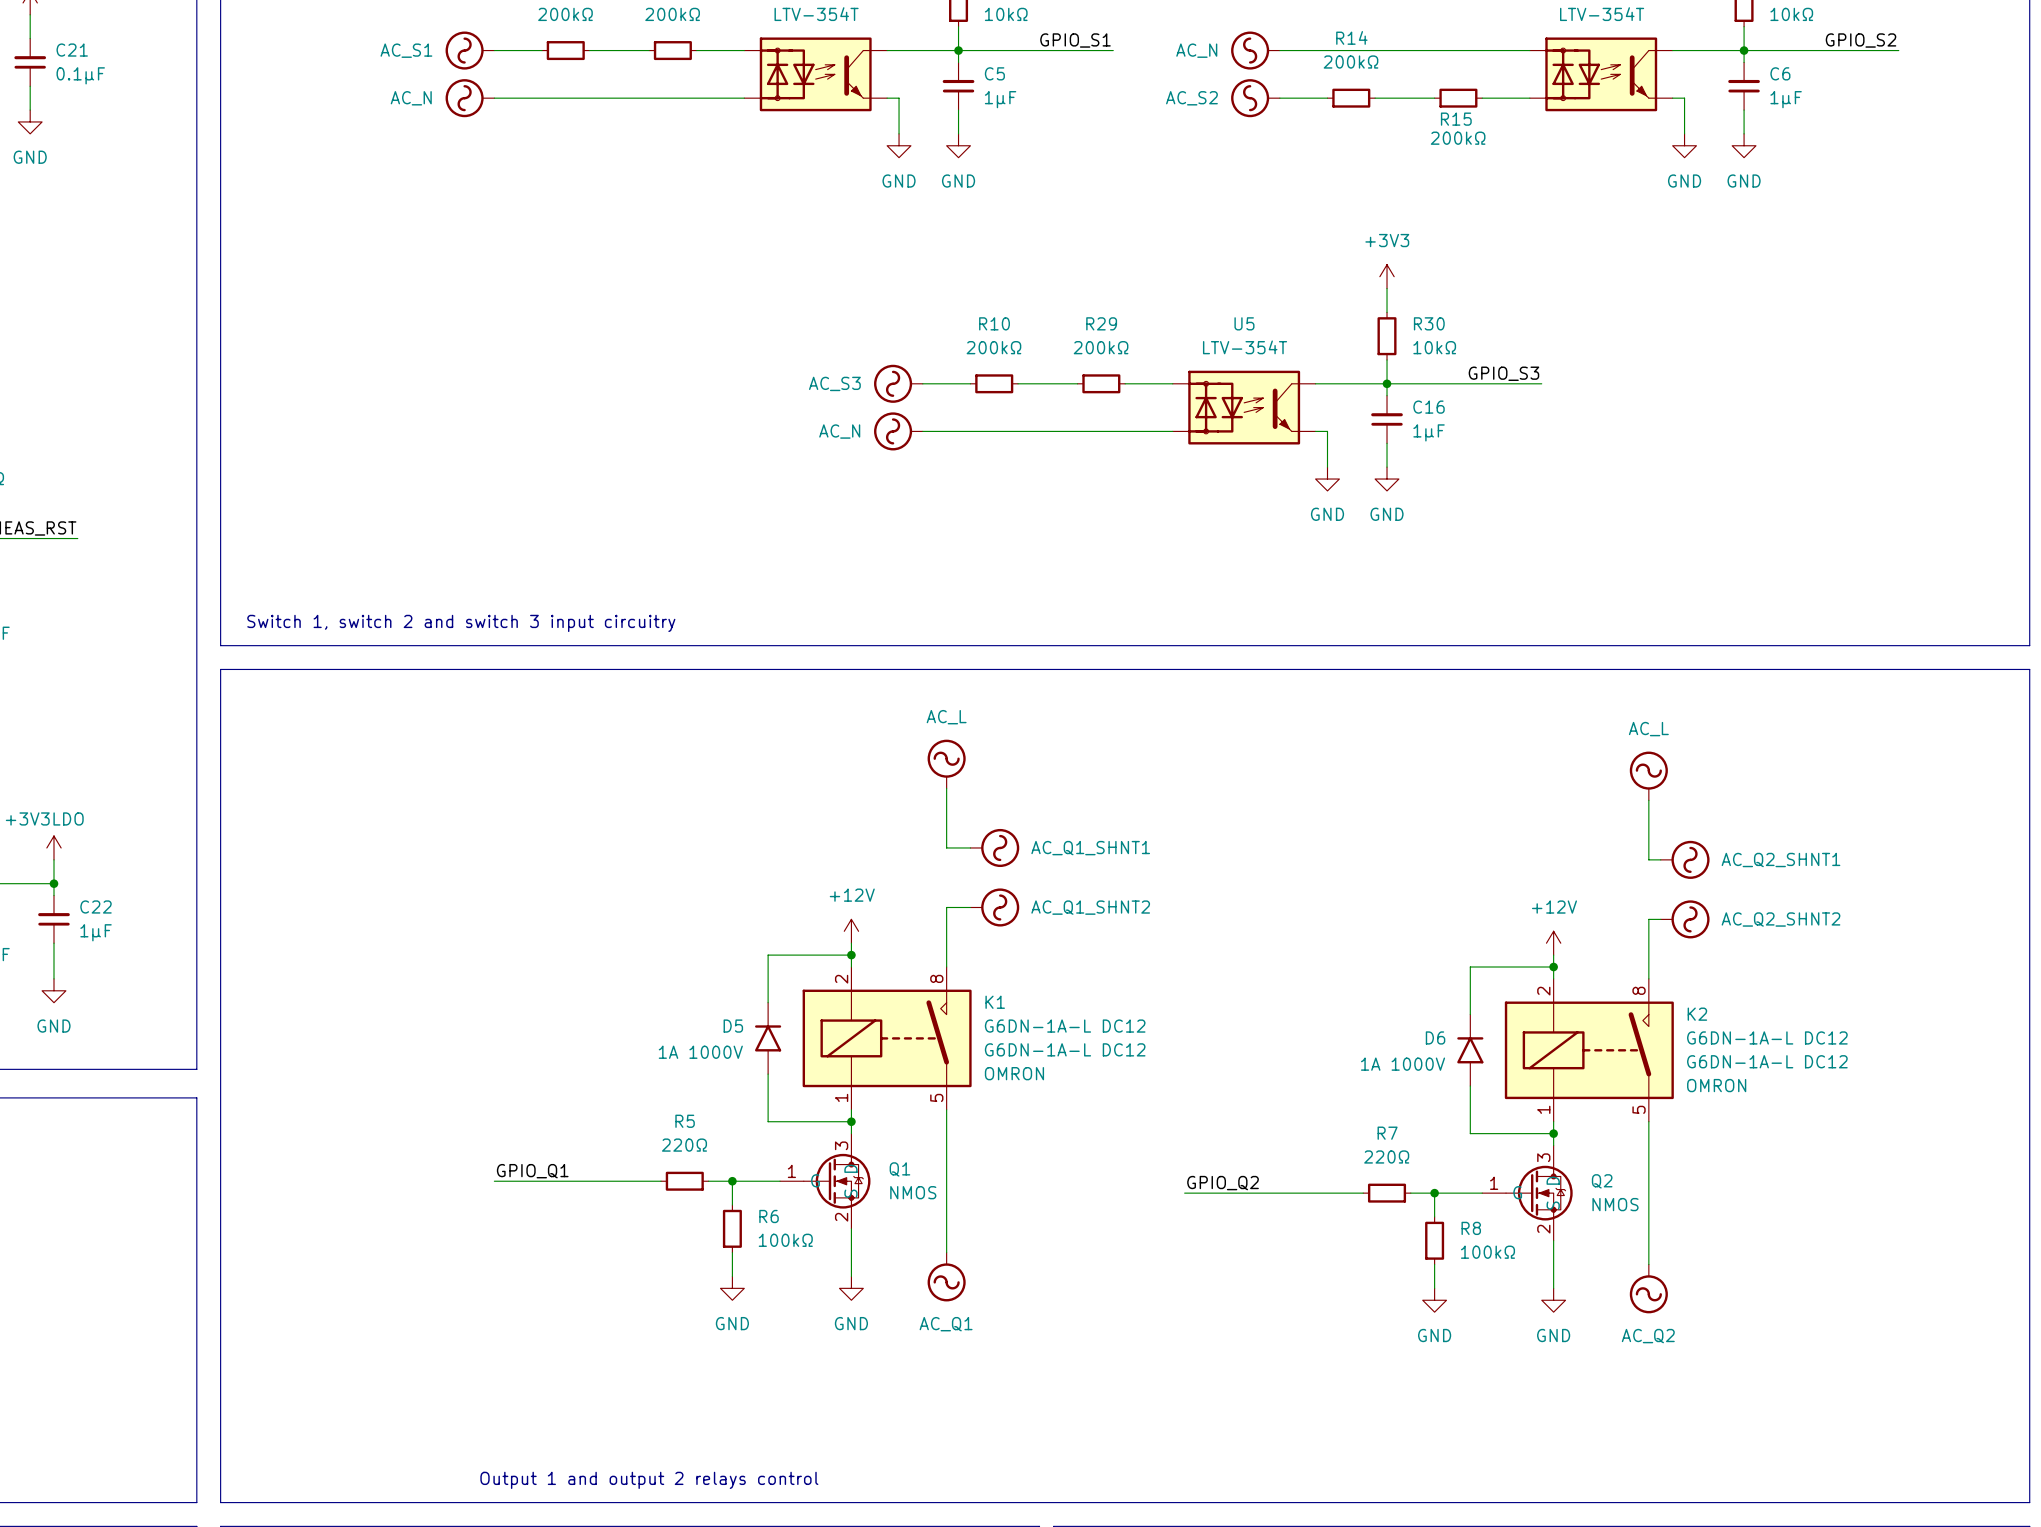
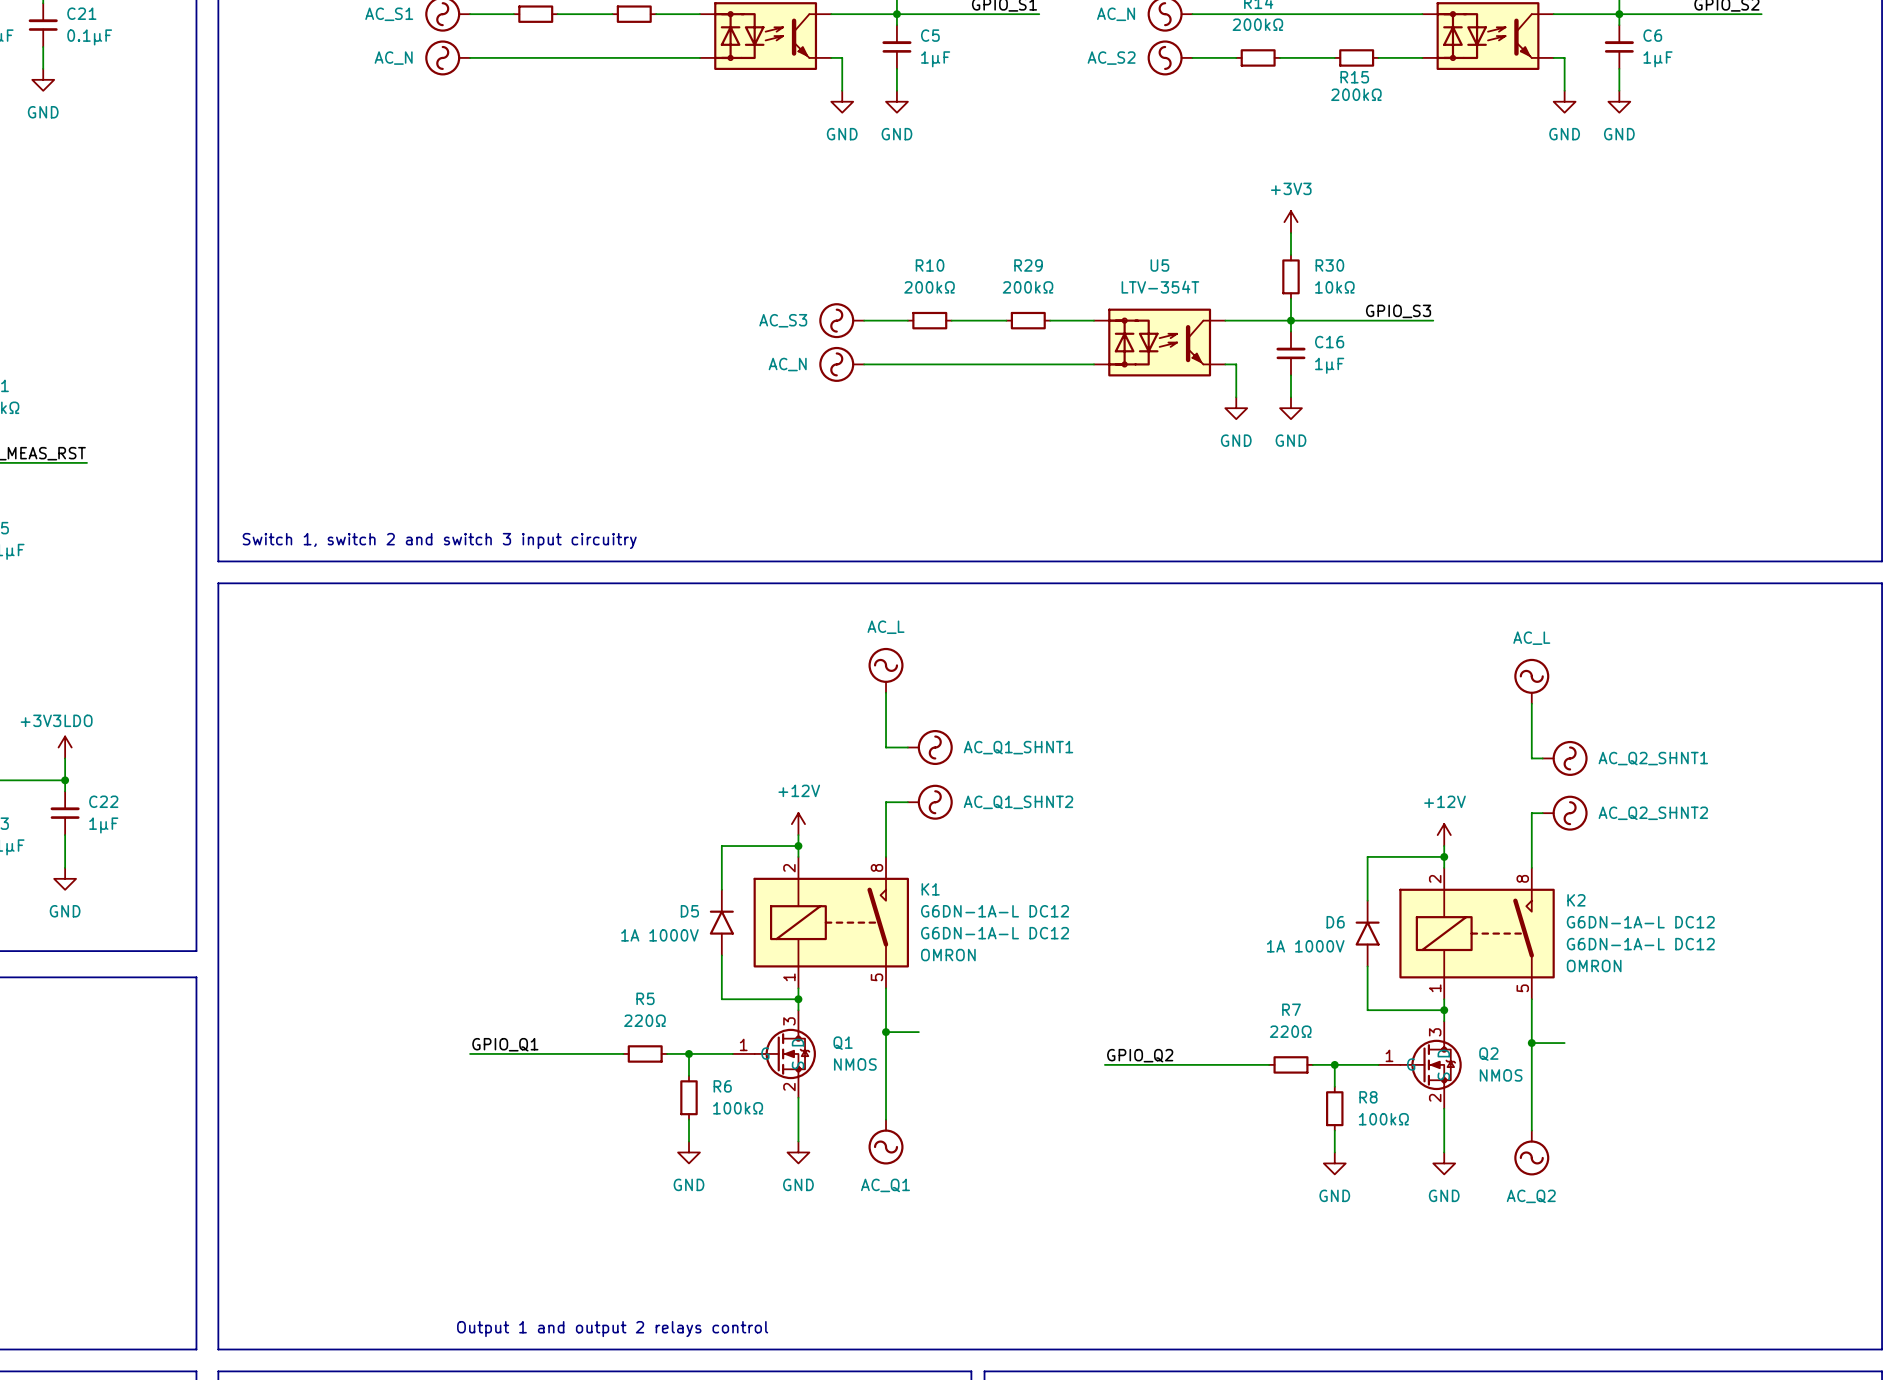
wire: none -> (886, 1032) (918, 1032)
junction: none -> (886, 1032)
wire: none -> (1531, 1043) (1564, 1043)
junction: none -> (1531, 1043)

